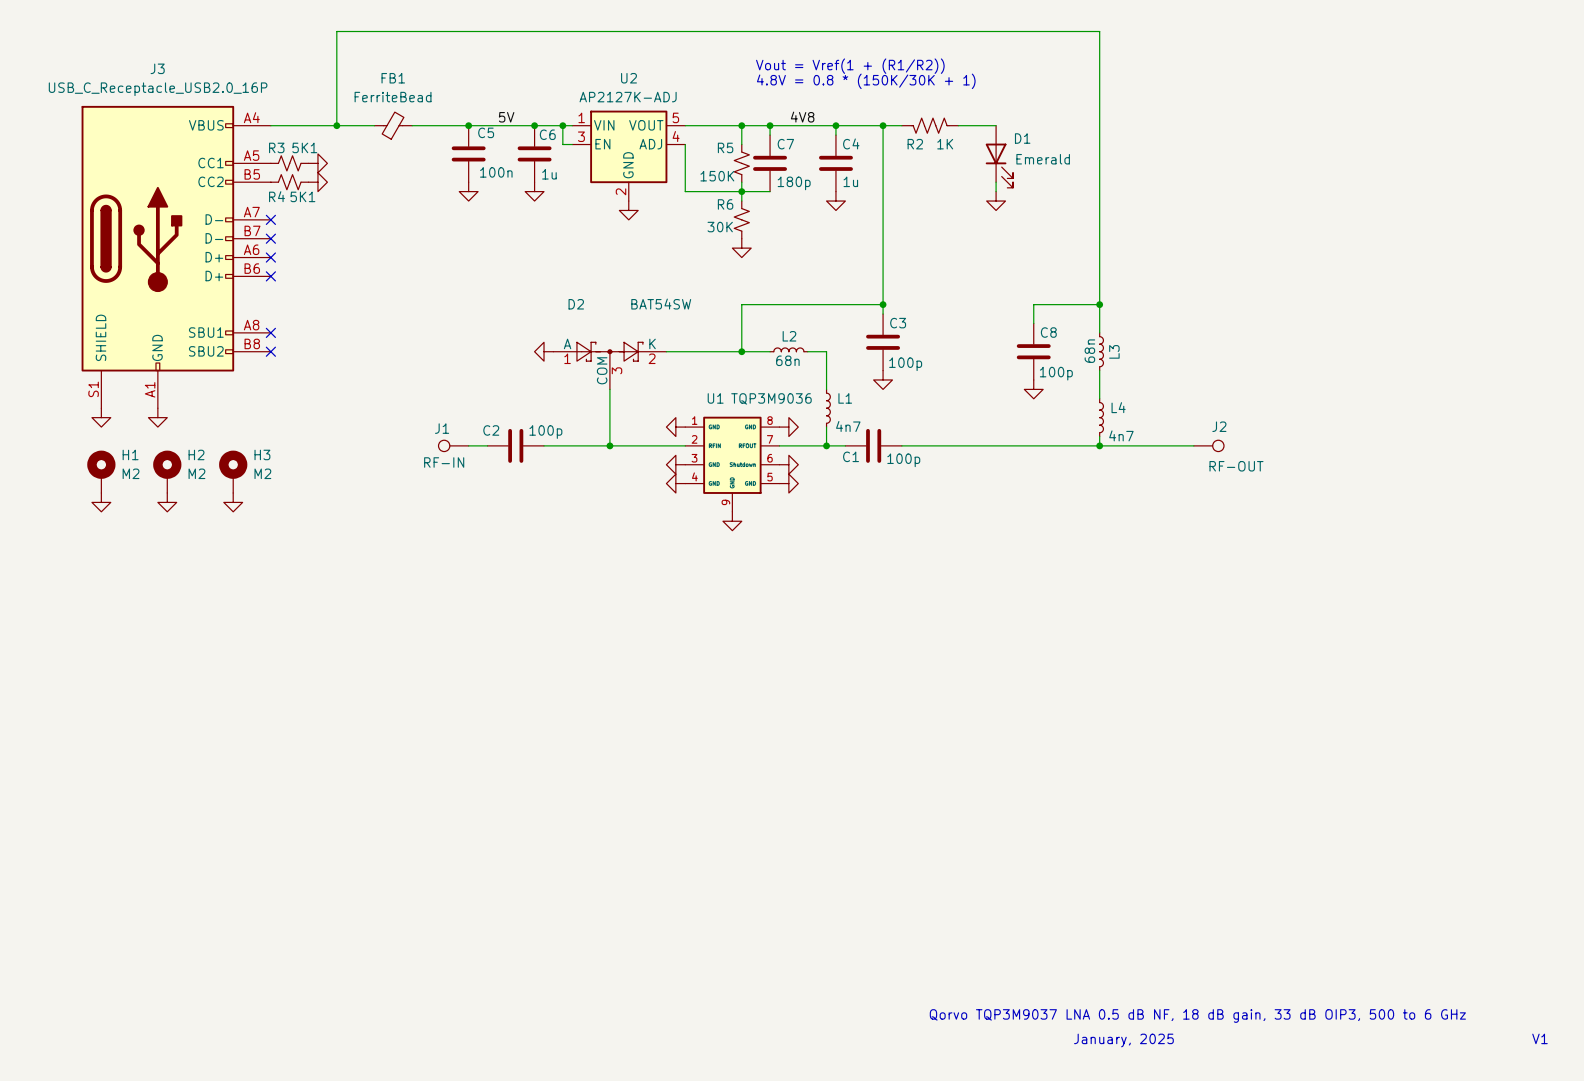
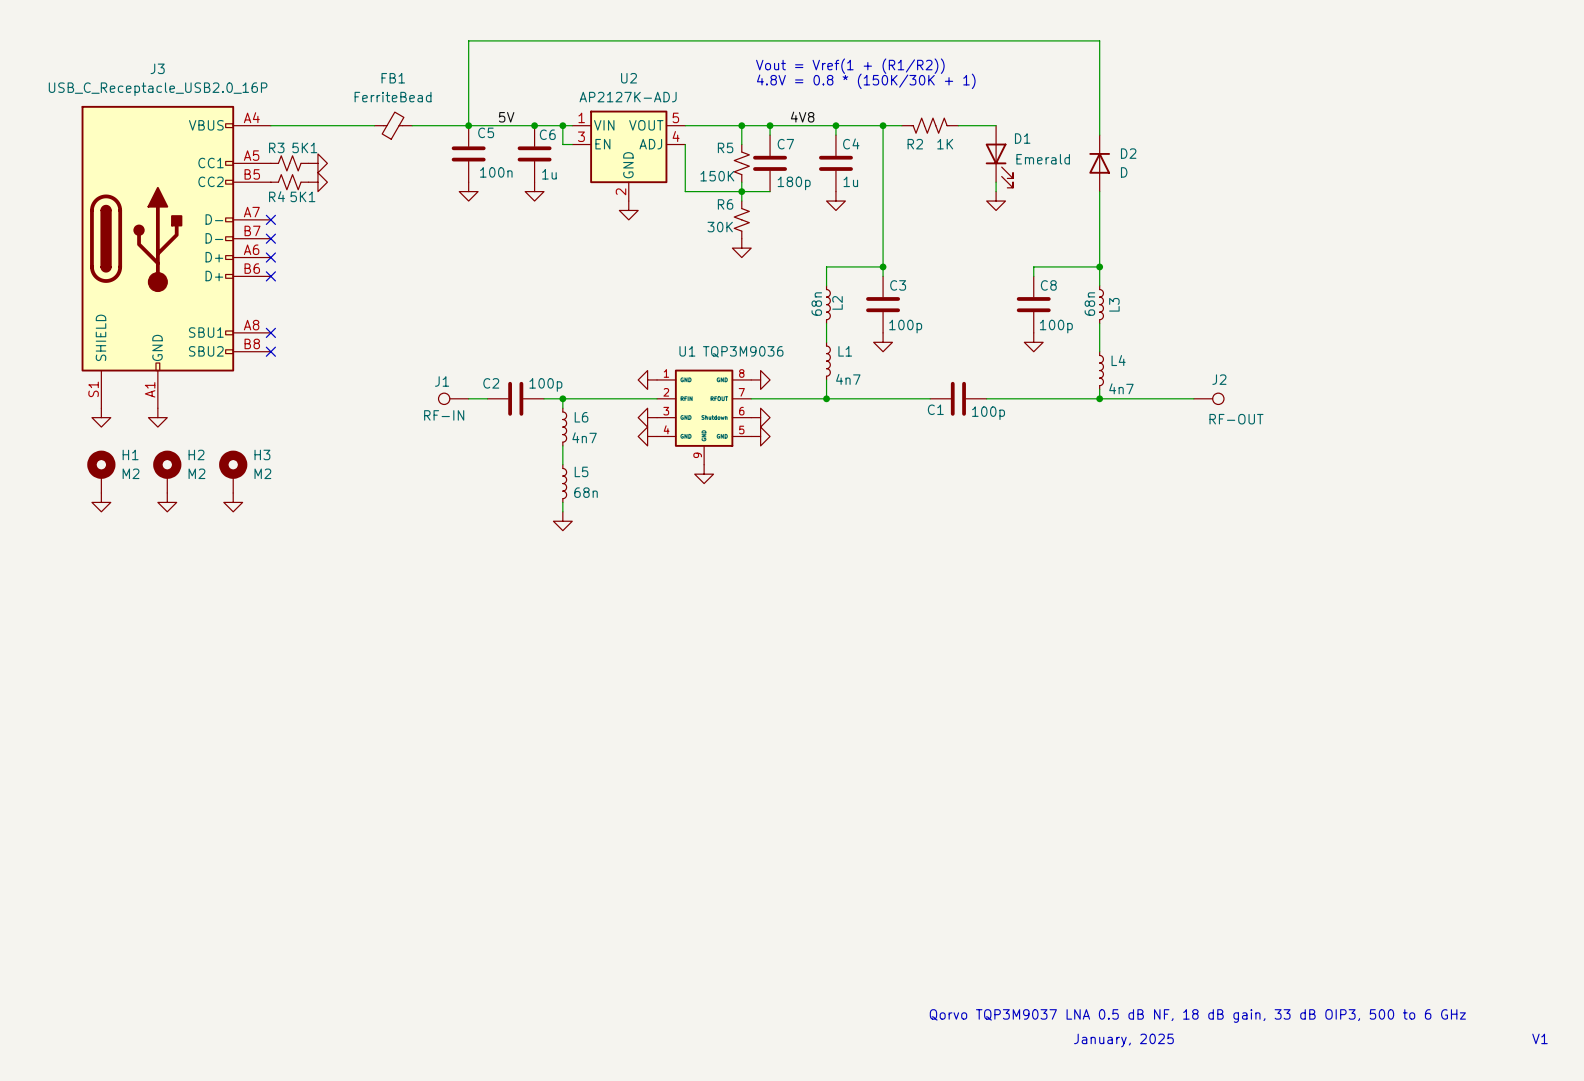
wire: (1099, 40) (1099, 31) (336, 31) (336, 125) -> (1099, 40) (468, 40) (468, 125)
junction: (336, 125) -> none
wire: none -> (883, 266) (826, 266) (826, 285)
wire: none -> (1099, 266) (1033, 266) (1033, 276)
wire: (1099, 285) (1099, 323) -> none
D2 name position: D2 (576, 304) -> D2 (1128, 153)
D2 value: BAT54SW (661, 304) -> D (1124, 172)
wire: (883, 304) (741, 304) (741, 351) -> none
junction position: (883, 304) -> (883, 266)
wire: (1099, 304) (1033, 304) (1033, 323) -> none
junction position: (1099, 304) -> (1099, 266)
D2 symbol: [553, 342, 667, 390] -> [1089, 135, 1111, 192]
C3 position: (883, 342) -> (883, 304)
L2 rotation: 0° (788, 349) -> 90° clockwise (828, 304)
L2 position: (788, 349) -> (828, 304)
power symbol: (544, 351) -> none
wire: (666, 351) (770, 351) -> none
junction: (741, 351) -> none
wire: (807, 351) (826, 351) (826, 379) -> none
C8 position: (1033, 351) -> (1033, 304)
L3 position: (1101, 351) -> (1101, 304)
wire: (1099, 370) (1099, 389) -> (1099, 332) (1099, 351)
power symbol: none -> (647, 379)
power symbol: none -> (760, 379)
power symbol position: (883, 379) -> (883, 342)
wire: (609, 389) (609, 445) -> none
wire: none -> (826, 389) (826, 398)
power symbol position: (1033, 389) -> (1033, 342)
wire: none -> (544, 398) (657, 398)
wire: none -> (562, 398) (562, 408)
junction: none -> (562, 398)
wire: none -> (751, 398) (930, 398)
junction: none -> (826, 398)
wire: none -> (986, 398) (1193, 398)
junction: none -> (1099, 398)
L1 position: (828, 408) -> (828, 361)
power symbol: none -> (647, 417)
power symbol: none -> (760, 417)
L4 position: (1101, 417) -> (1101, 370)
L6: none -> 4n7 (564, 427)
power symbol: (675, 427) -> none
power symbol: (788, 427) -> none
wire: (826, 427) (826, 445) -> (826, 323) (826, 342)
power symbol: none -> (647, 436)
power symbol: none -> (760, 436)
wire: (1099, 436) (1099, 445) -> none
J1 position: (453, 445) -> (453, 398)
wire: (468, 445) (487, 445) -> (468, 398) (487, 398)
C2 position: (515, 445) -> (515, 398)
wire: (544, 445) (685, 445) -> none
wire: none -> (562, 445) (562, 464)
junction: (609, 445) -> none
wire: (779, 445) (845, 445) -> none
junction: (826, 445) -> none
C1 position: (873, 445) -> (958, 398)
wire: (901, 445) (1193, 445) -> none
junction: (1099, 445) -> none
J2 position: (1208, 445) -> (1208, 398)
power symbol: (675, 464) -> none
U1 position: (732, 464) -> (704, 417)
power symbol: (788, 464) -> none
power symbol: none -> (704, 474)
L5: none -> 68n (564, 483)
power symbol: (675, 483) -> none
power symbol: (788, 483) -> none
wire: none -> (562, 502) (562, 511)
power symbol: none -> (562, 521)
power symbol: (732, 521) -> none

